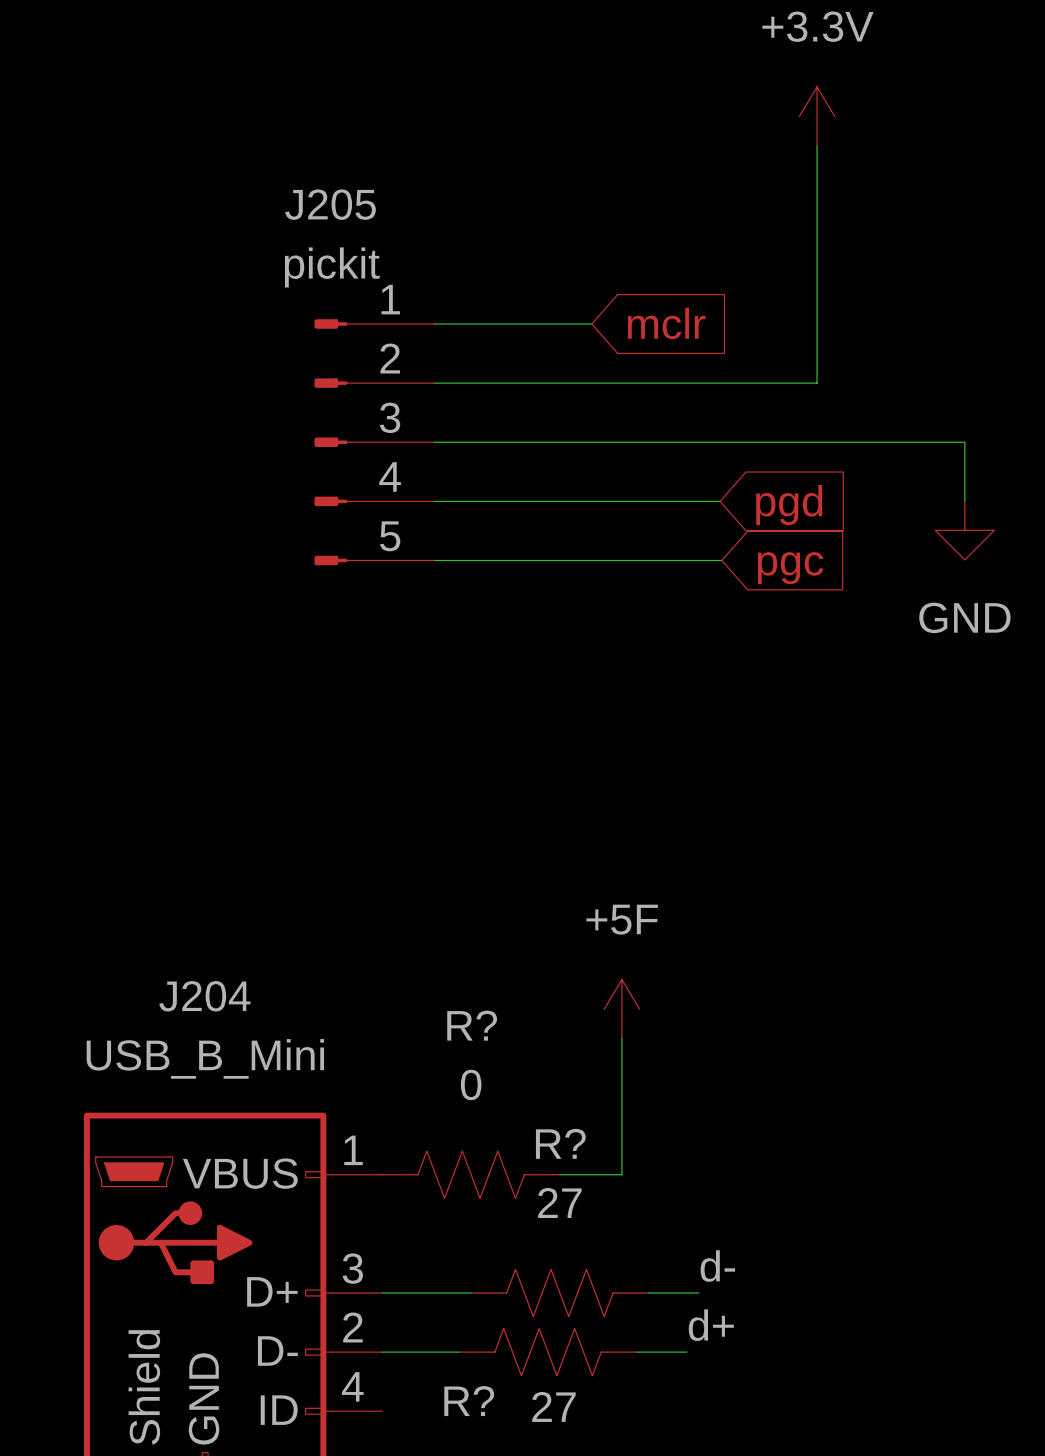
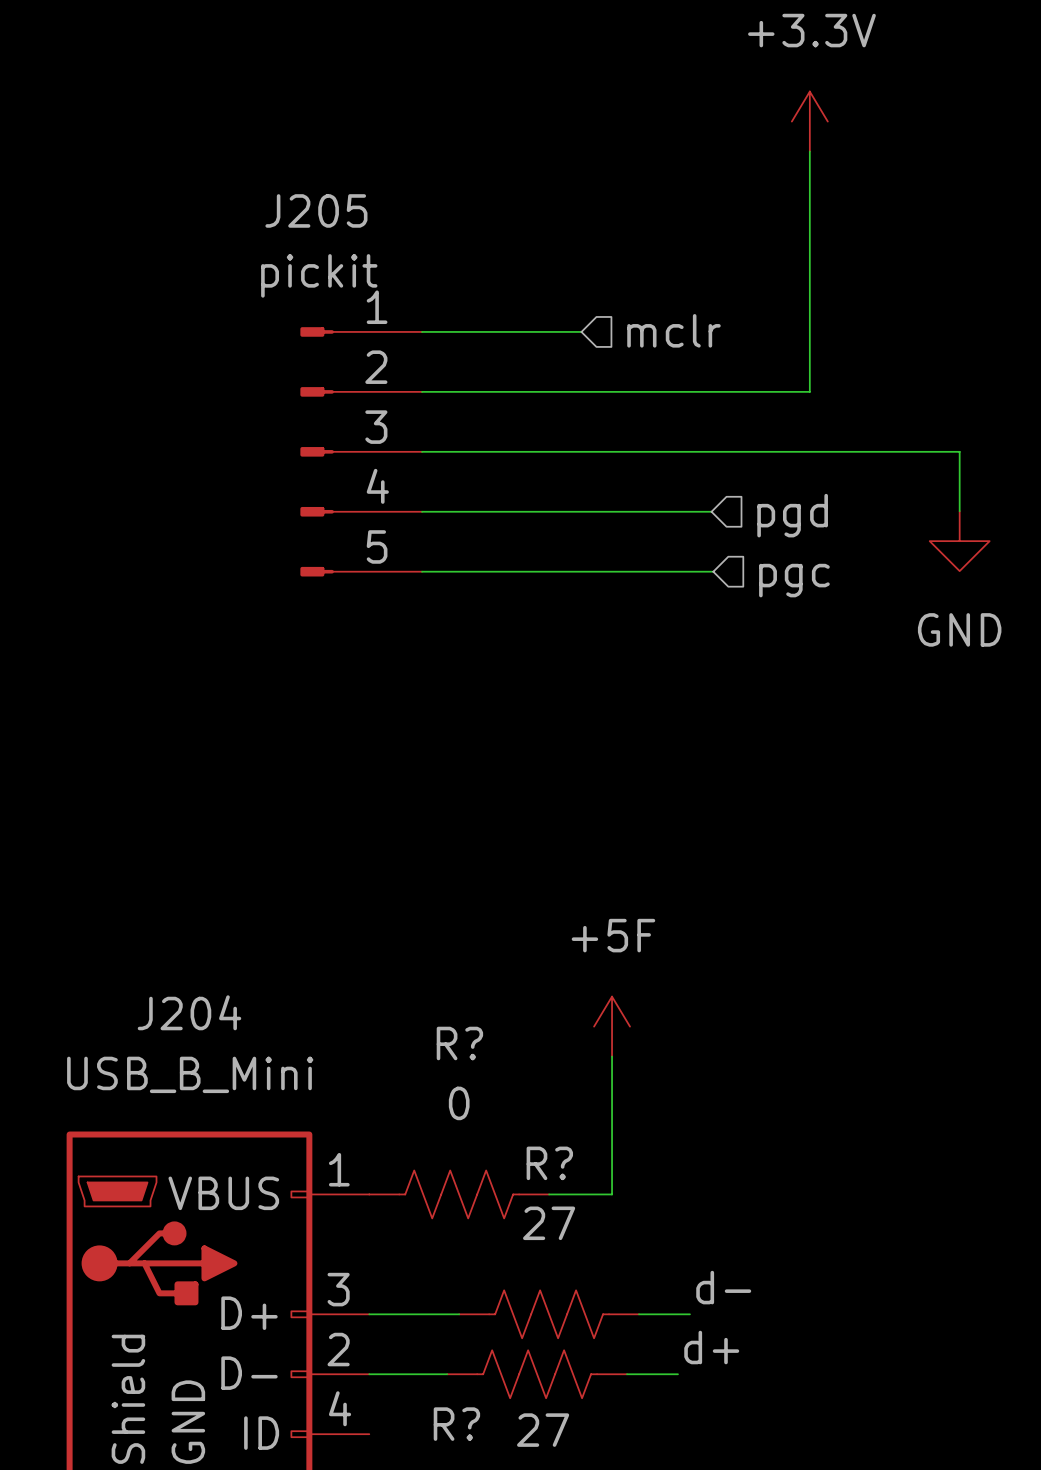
hierarchical label: none -> mclr (673, 330)
global label: mclr (666, 323) -> none
hierarchical label: none -> pgd (792, 515)
global label: pgd (789, 505) -> none
hierarchical label: none -> pgc (794, 580)
global label: pgc (790, 568) -> none

